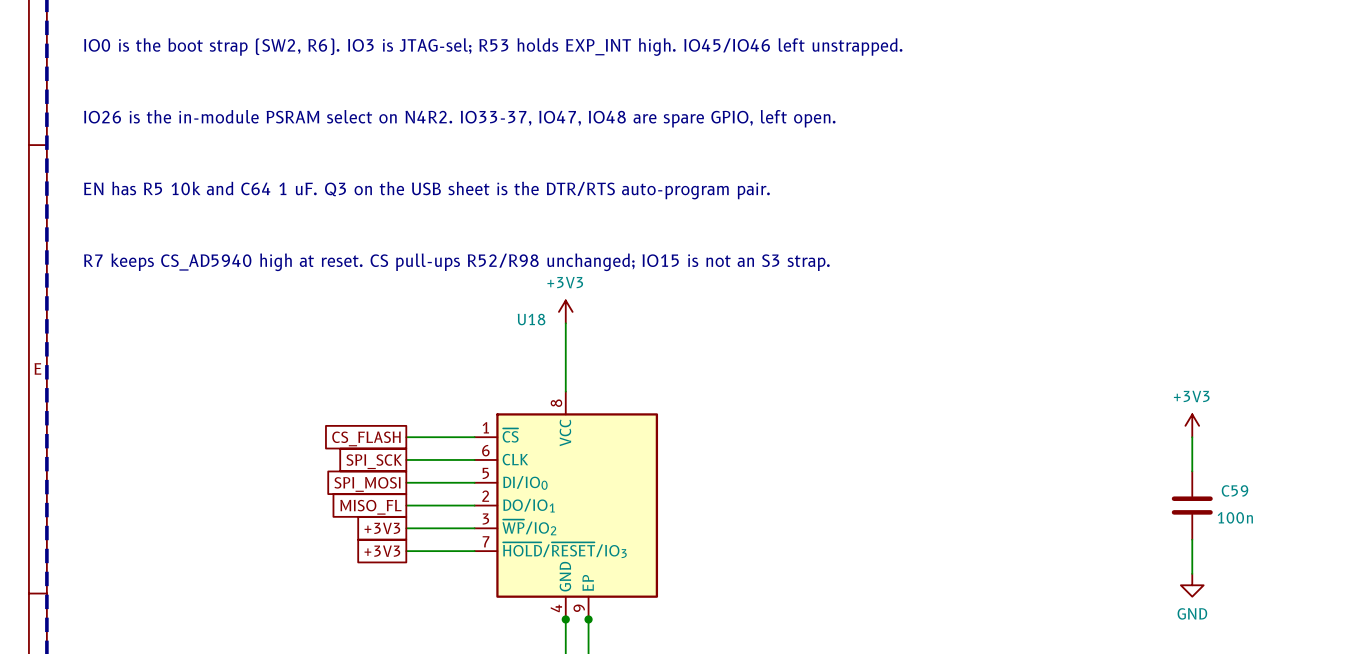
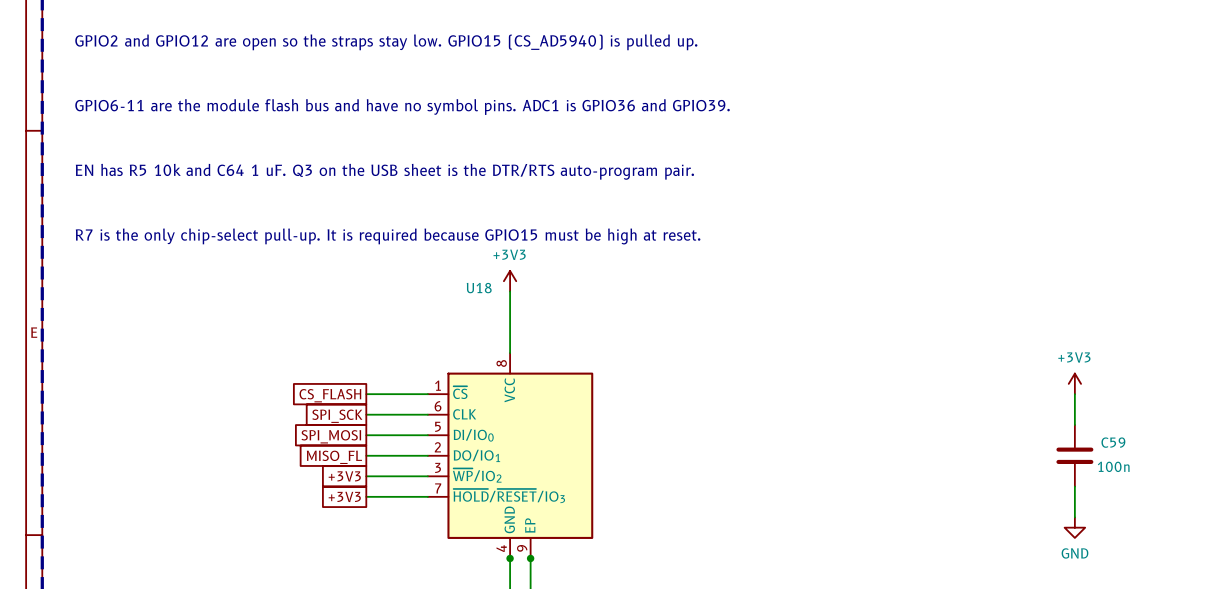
text: IO0 is the boot strap (SW2, R6). IO3 is JTAG-sel; R53 holds EXP_INT high. IO45/IO46 left unstrapped. (493, 47) -> GPIO2 and GPIO12 are open so the straps stay low. GPIO15 (CS_AD5940) is pulled up. (386, 42)
text: IO26 is the in-module PSRAM select on N4R2. IO33-37, IO47, IO48 are spare GPIO, left open. (459, 118) -> GPIO6-11 are the module flash bus and have no symbol pins. ADC1 is GPIO36 and GPIO39. (402, 107)
text: R7 keeps CS_AD5940 high at reset. CS pull-ups R52/R98 unchanged; IO15 is not an S3 strap. (456, 262) -> R7 is the only chip-select pull-up. It is required because GPIO15 must be high at reset. (388, 236)

